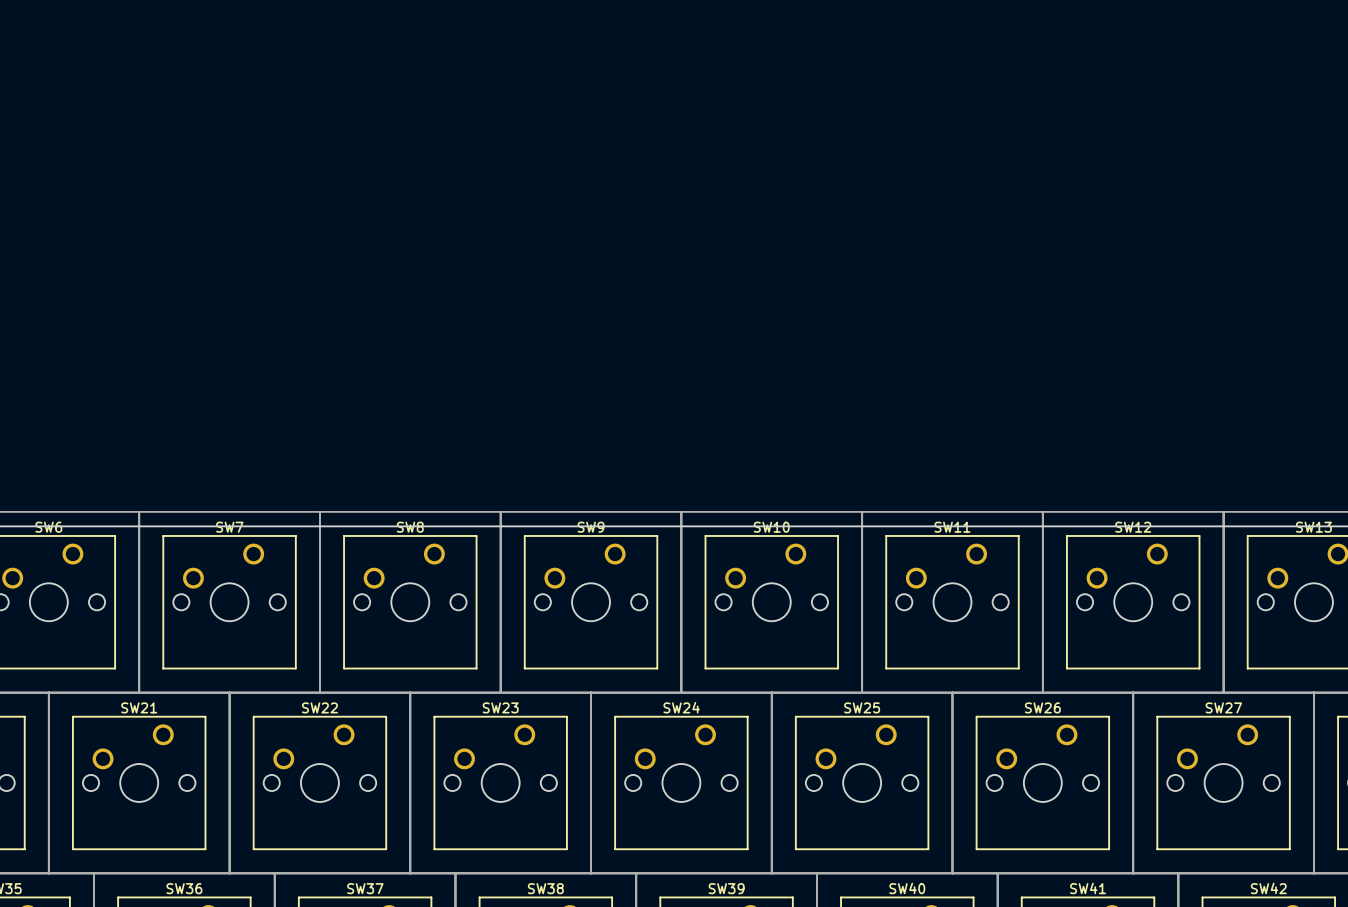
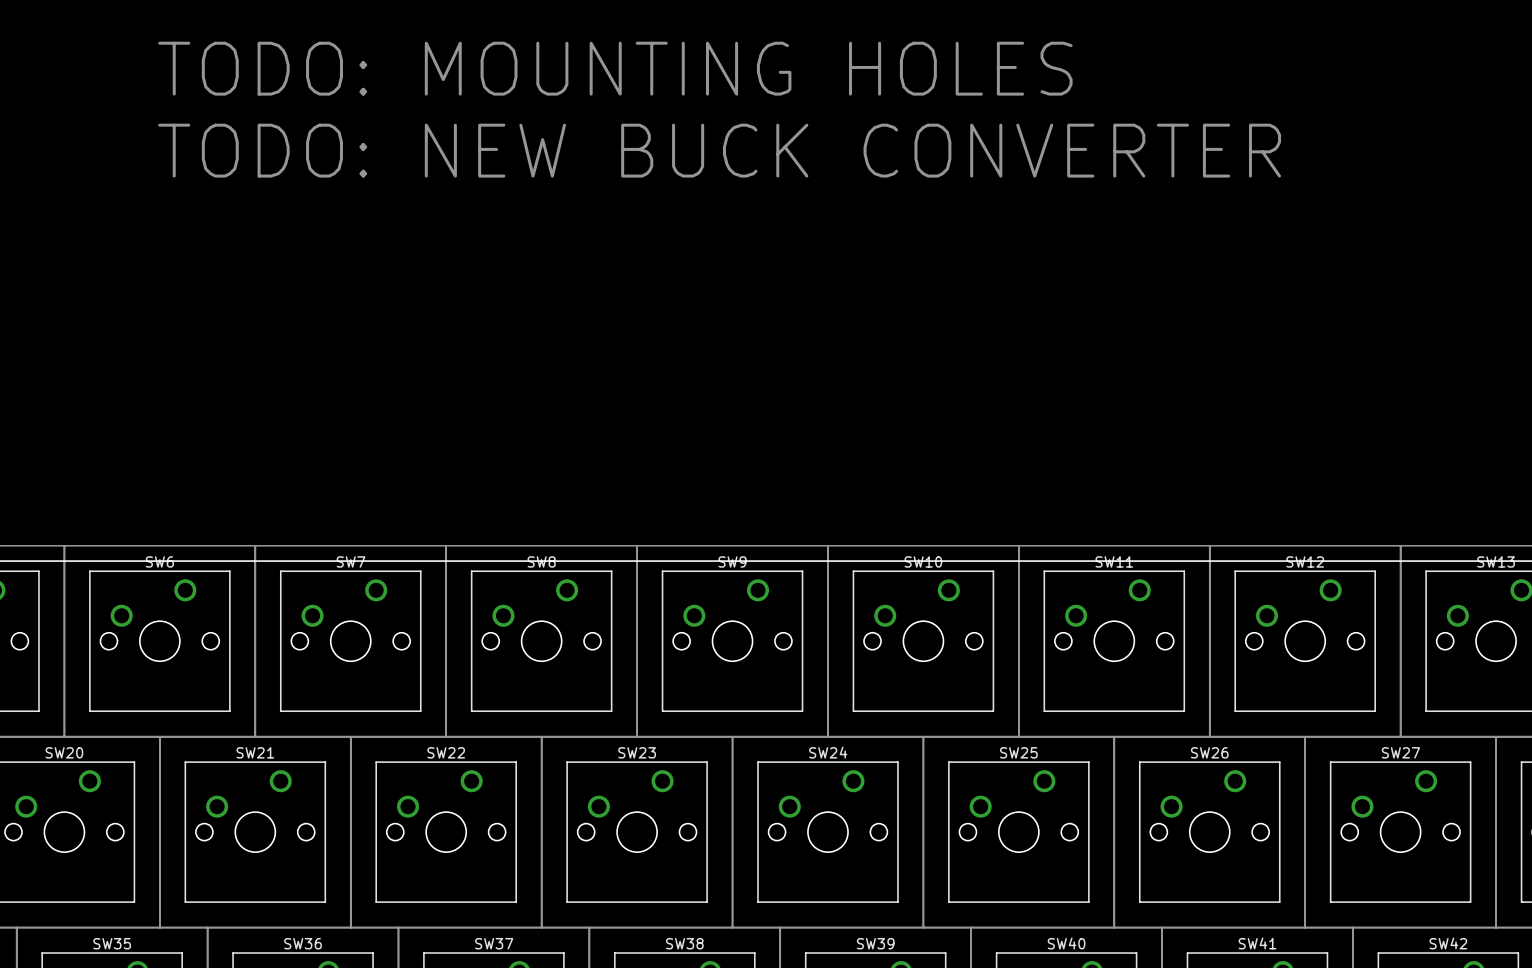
text: none -> TODO: MOUNTING HOLES (615, 68)
text: none -> TODO: NEW BUCK CONVERTER (719, 150)

